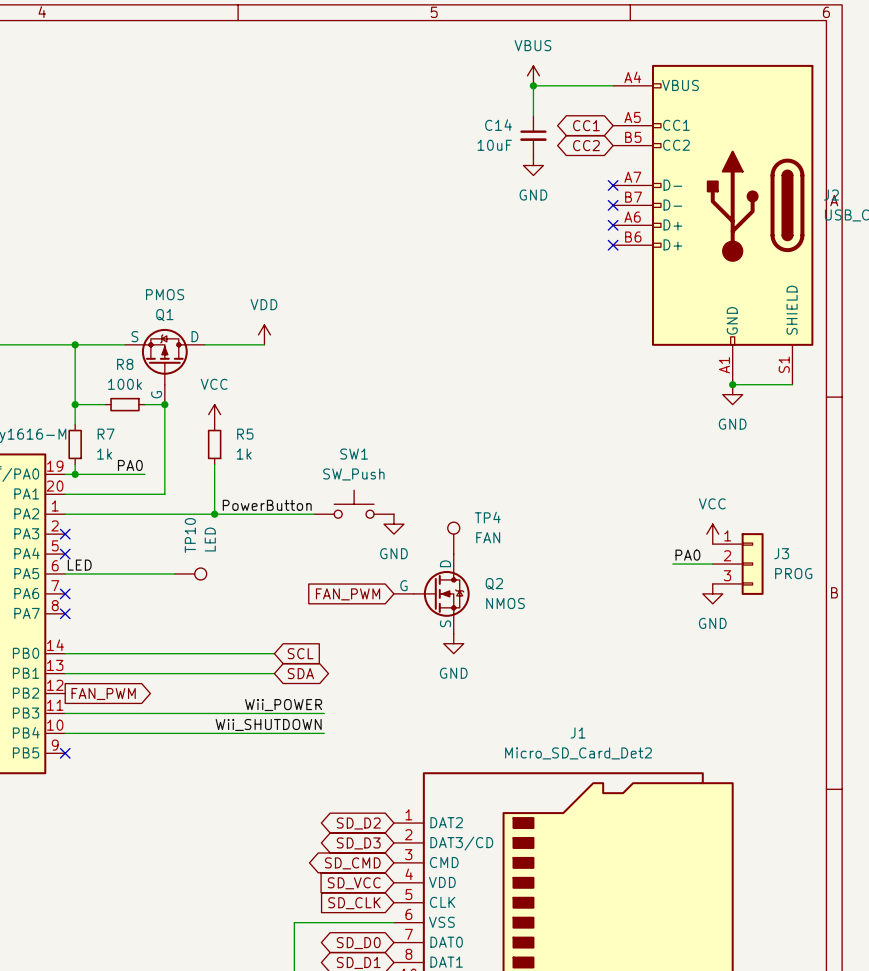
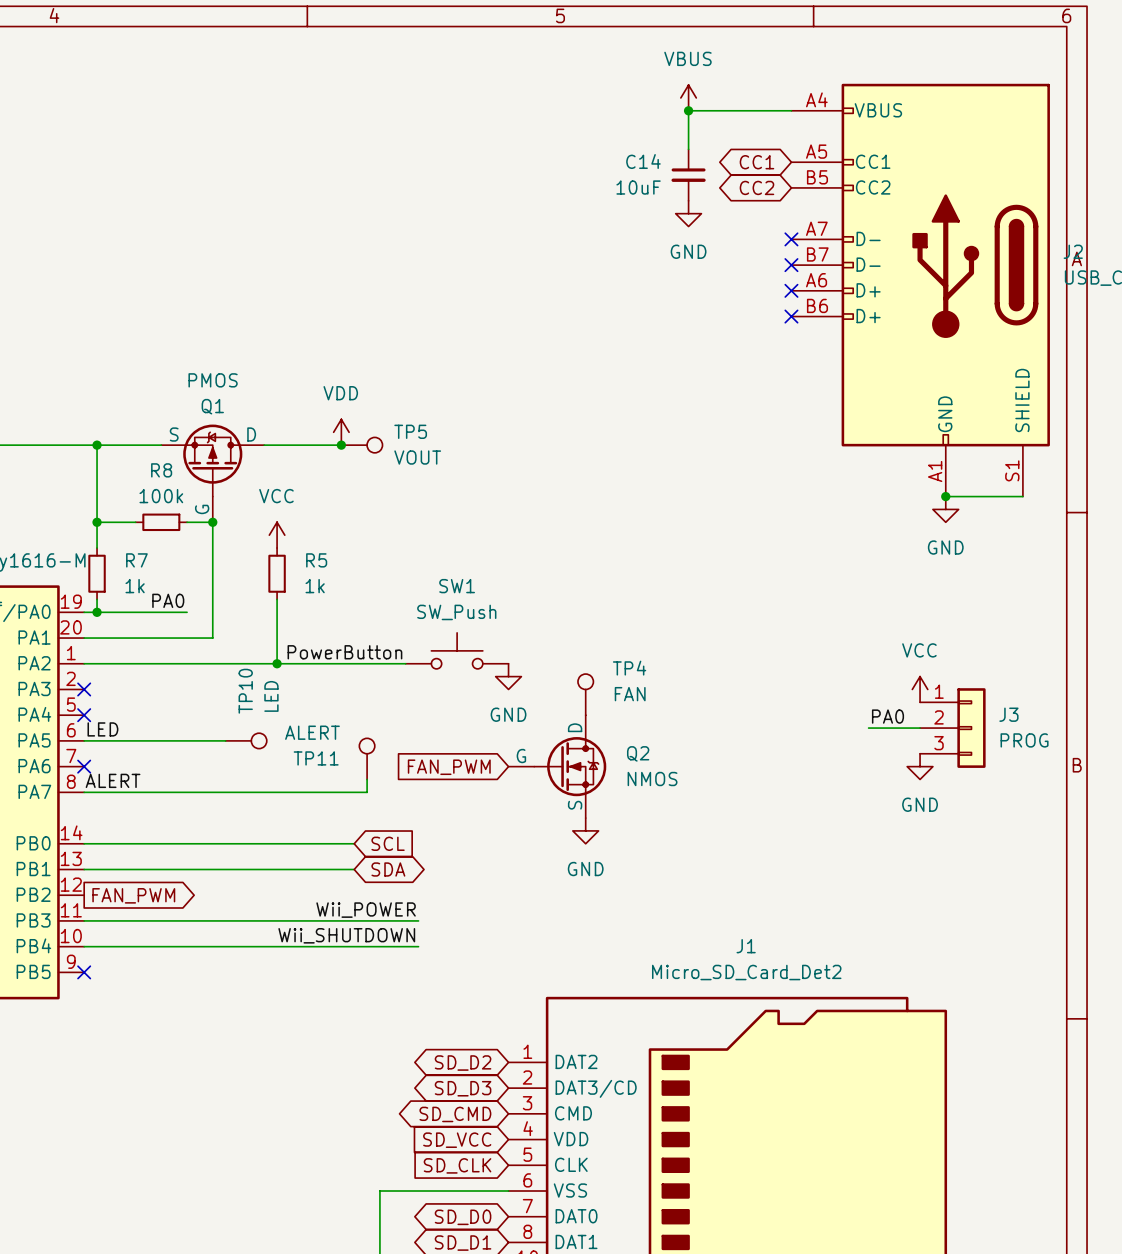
junction: none -> (341, 445)
TP5: none -> VOUT (361, 445)
TP11: none -> ALERT (367, 758)
wire: none -> (367, 779) (367, 792) (84, 792)
label: none -> ALERT (113, 780)
no-connect mark: (65, 613) -> none

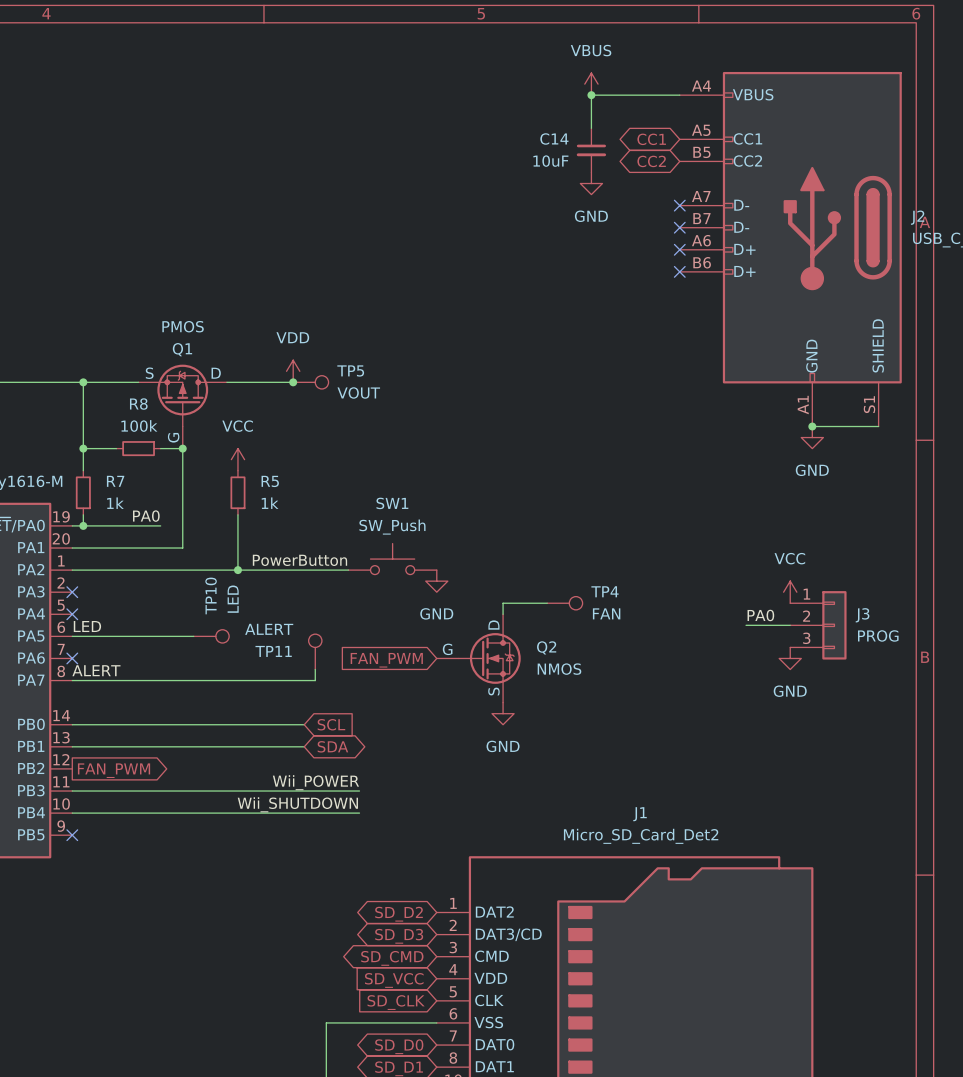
TP4 rotation: 0° (585, 681) -> 90° clockwise (575, 603)
TP4 position: (585, 694) -> (564, 603)
wire: none -> (547, 603) (503, 603) (503, 614)

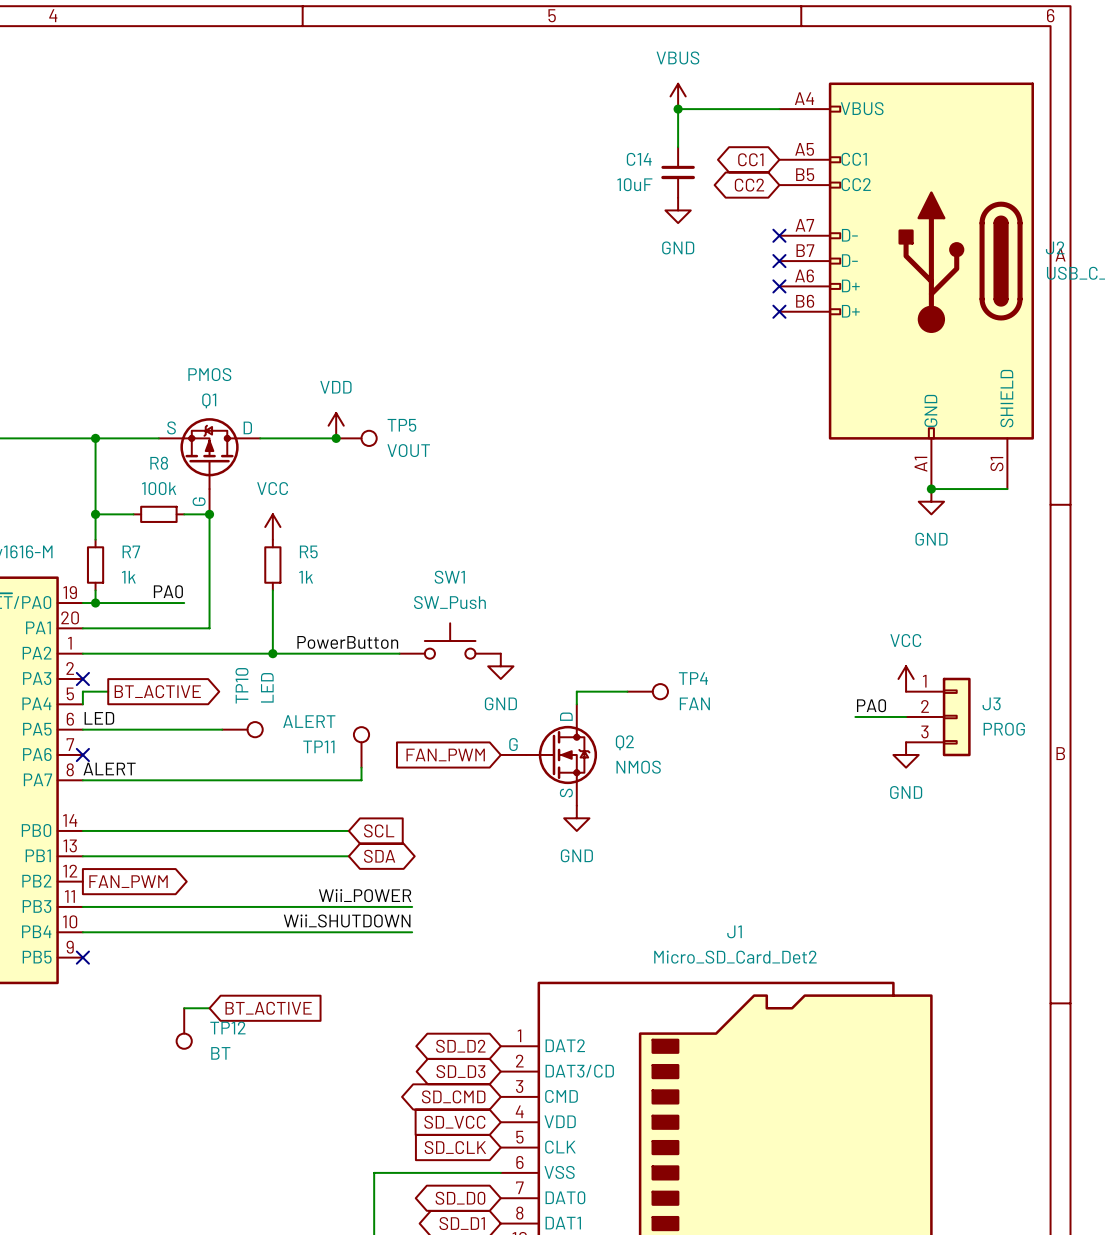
wire: none -> (108, 691) (82, 691) (82, 704)
global label: none -> BT_ACTIVE (157, 691)
no-connect mark: (72, 614) -> none
wire: none -> (184, 1008) (209, 1008)
global label: none -> BT_ACTIVE (268, 1008)
TP12: none -> BT (184, 1028)

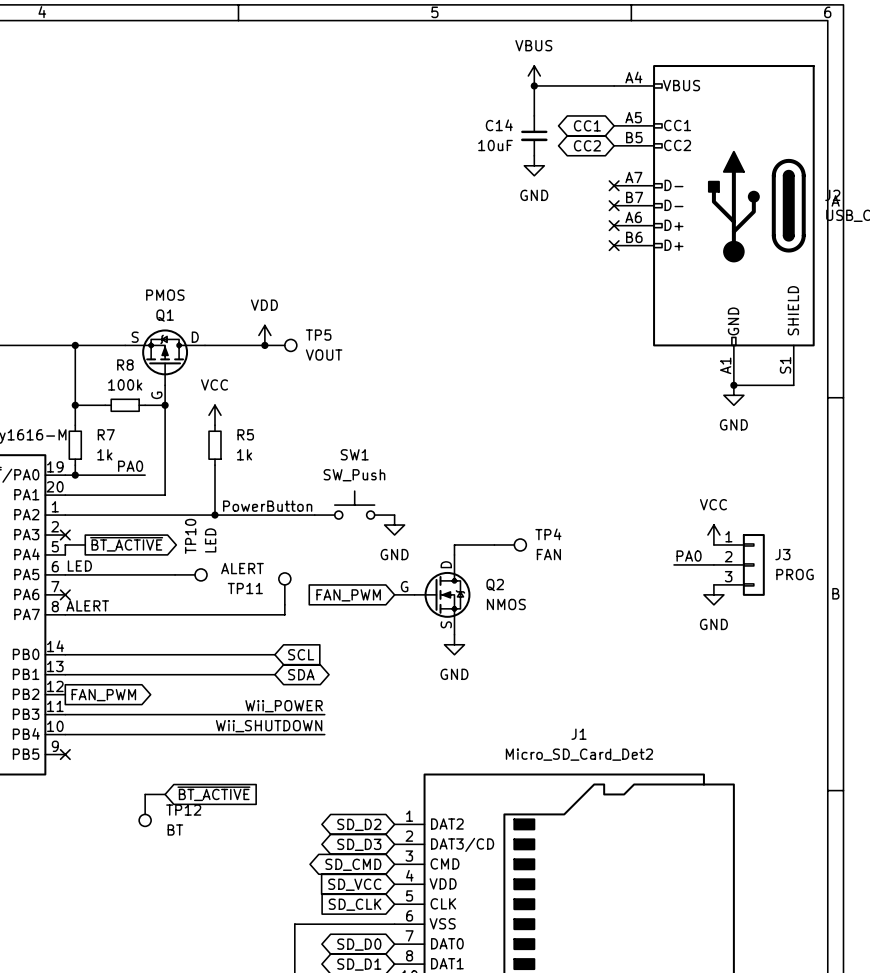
global label: BT_ACTIVE (157, 691) -> ~{BT_ACTIVE} (126, 544)
global label: BT_ACTIVE (268, 1008) -> ~{BT_ACTIVE} (213, 793)

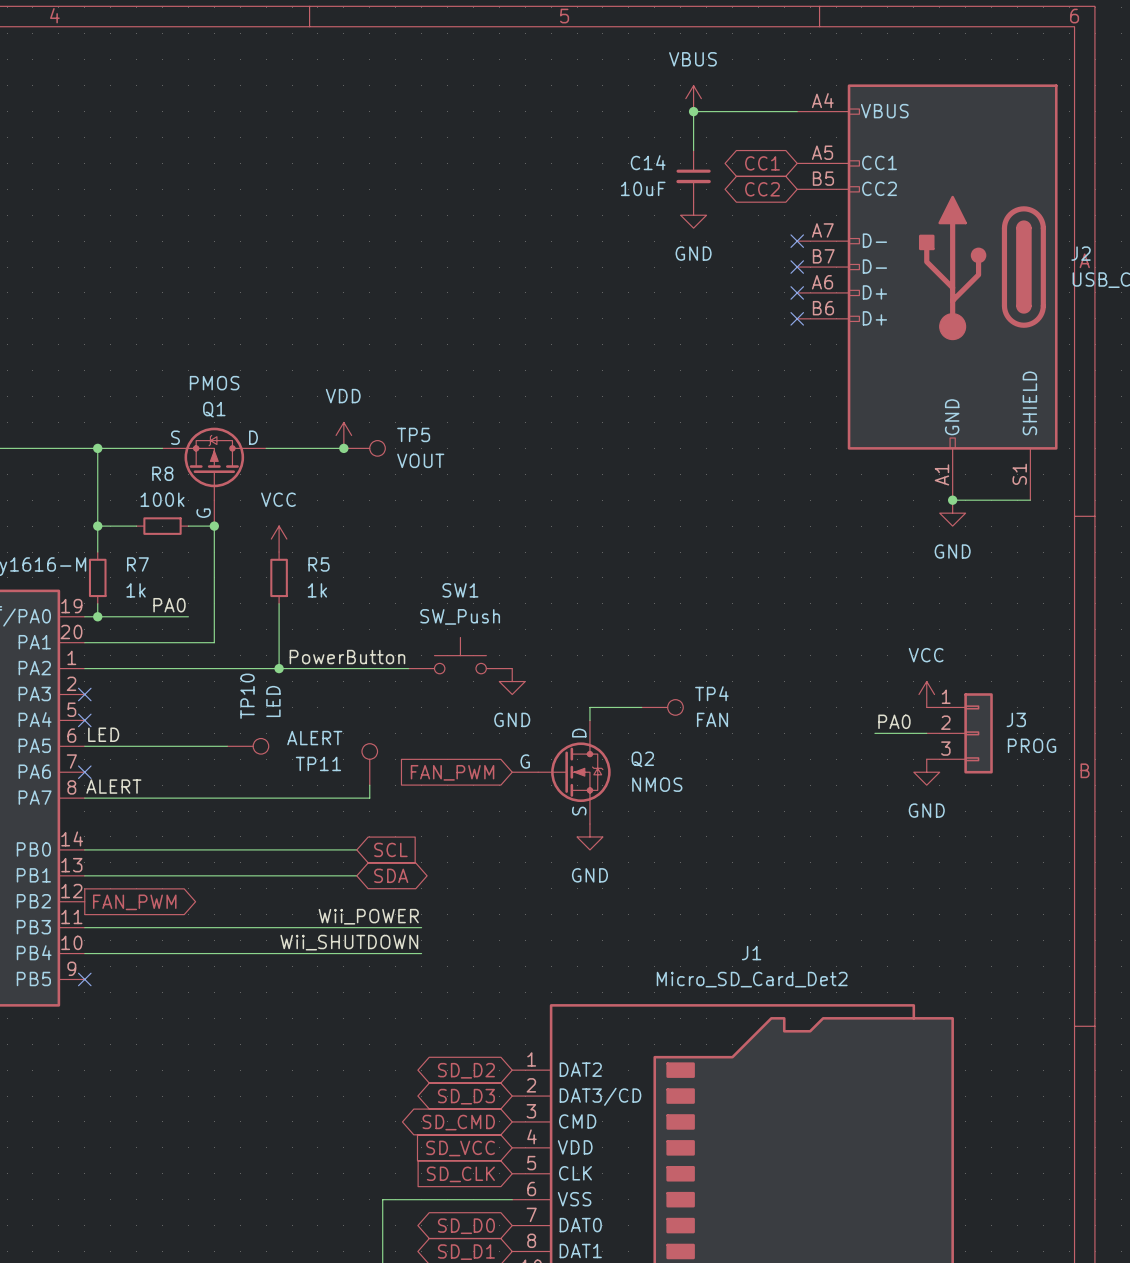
wire: (85, 544) (65, 544) (65, 554) -> none
global label: ~{BT_ACTIVE} (126, 544) -> none
no-connect mark: none -> (84, 720)
global label: ~{BT_ACTIVE} (213, 793) -> none
wire: (145, 794) (165, 794) -> none
TP12: BT (145, 810) -> none

